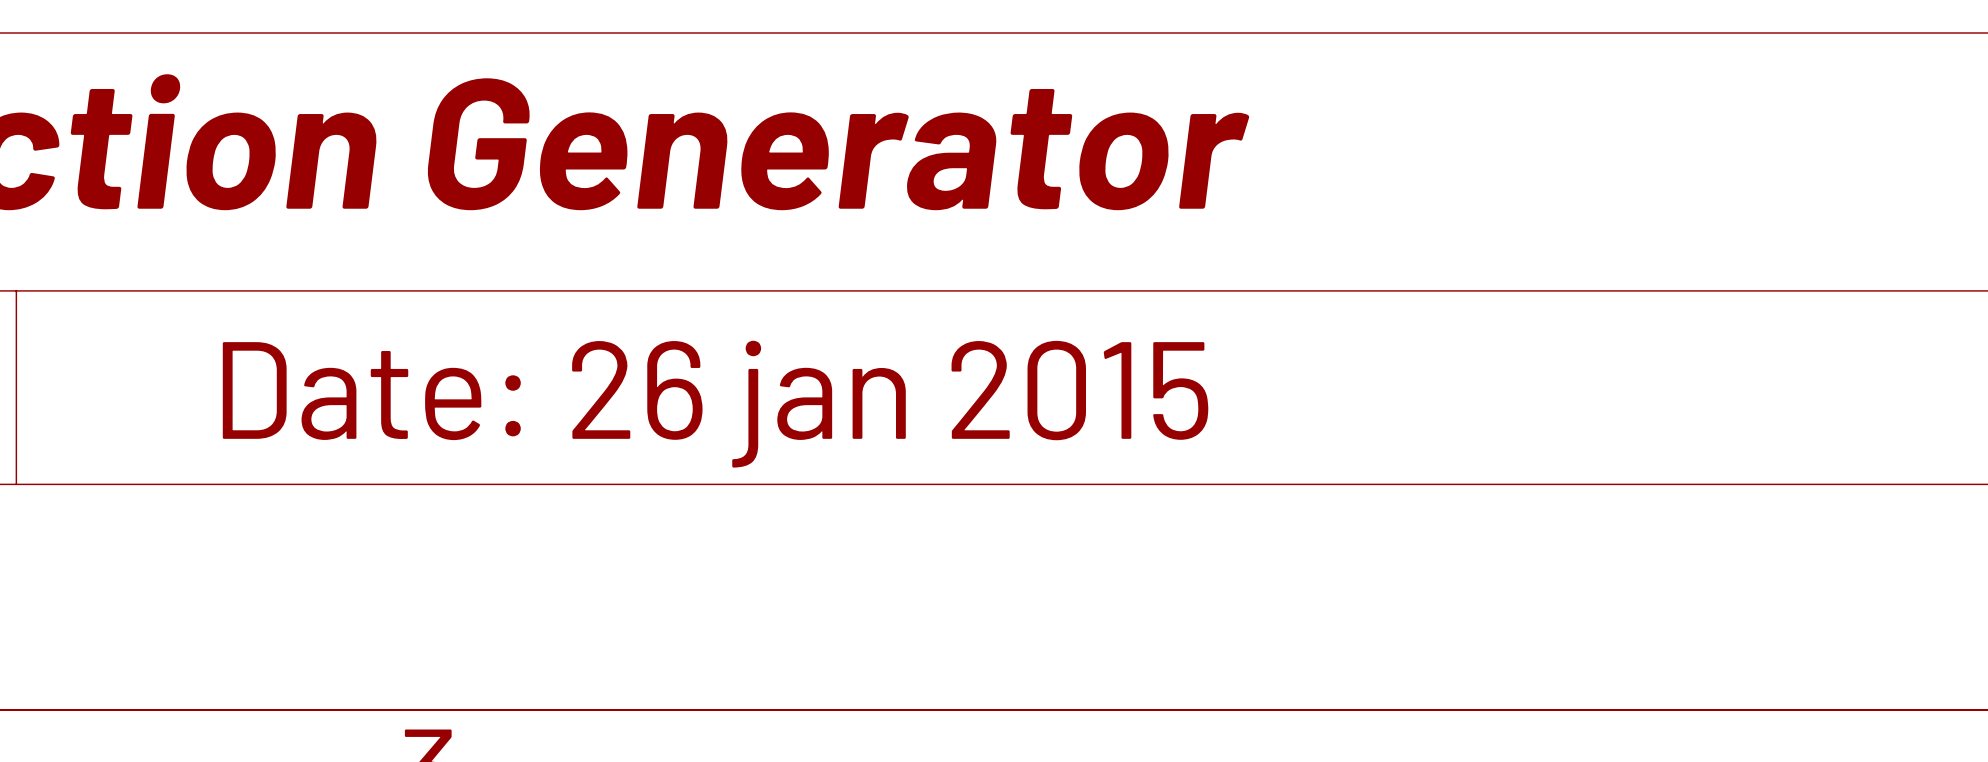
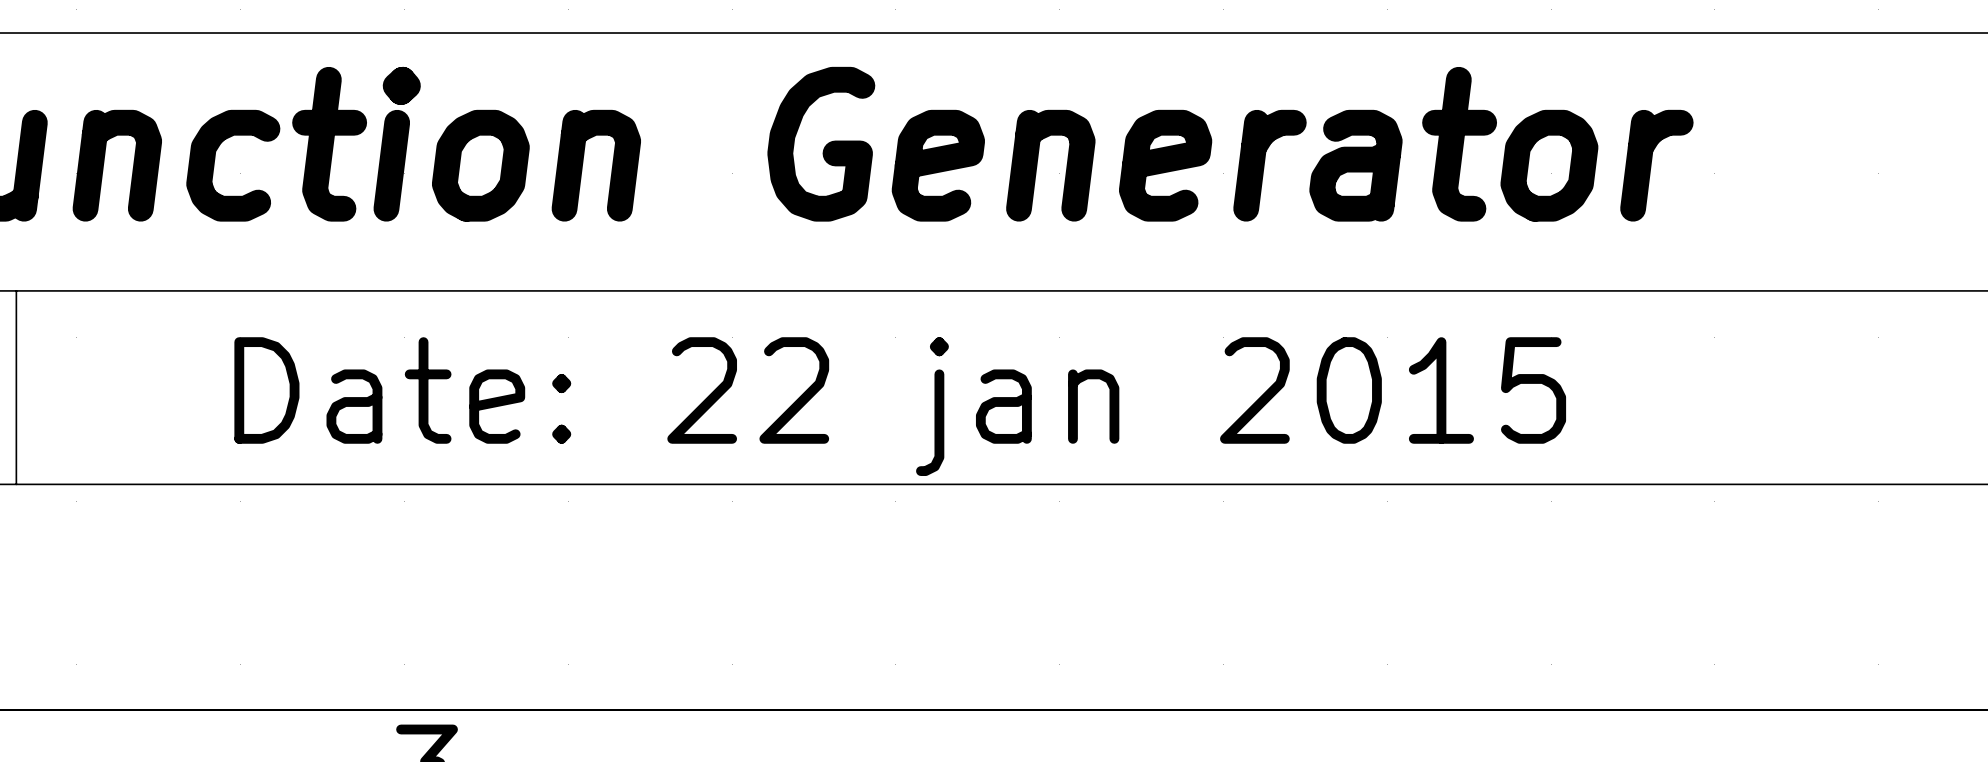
title block: Date: 26 jan 2015 (715, 404) -> Date: 22 jan 2015 (900, 406)

